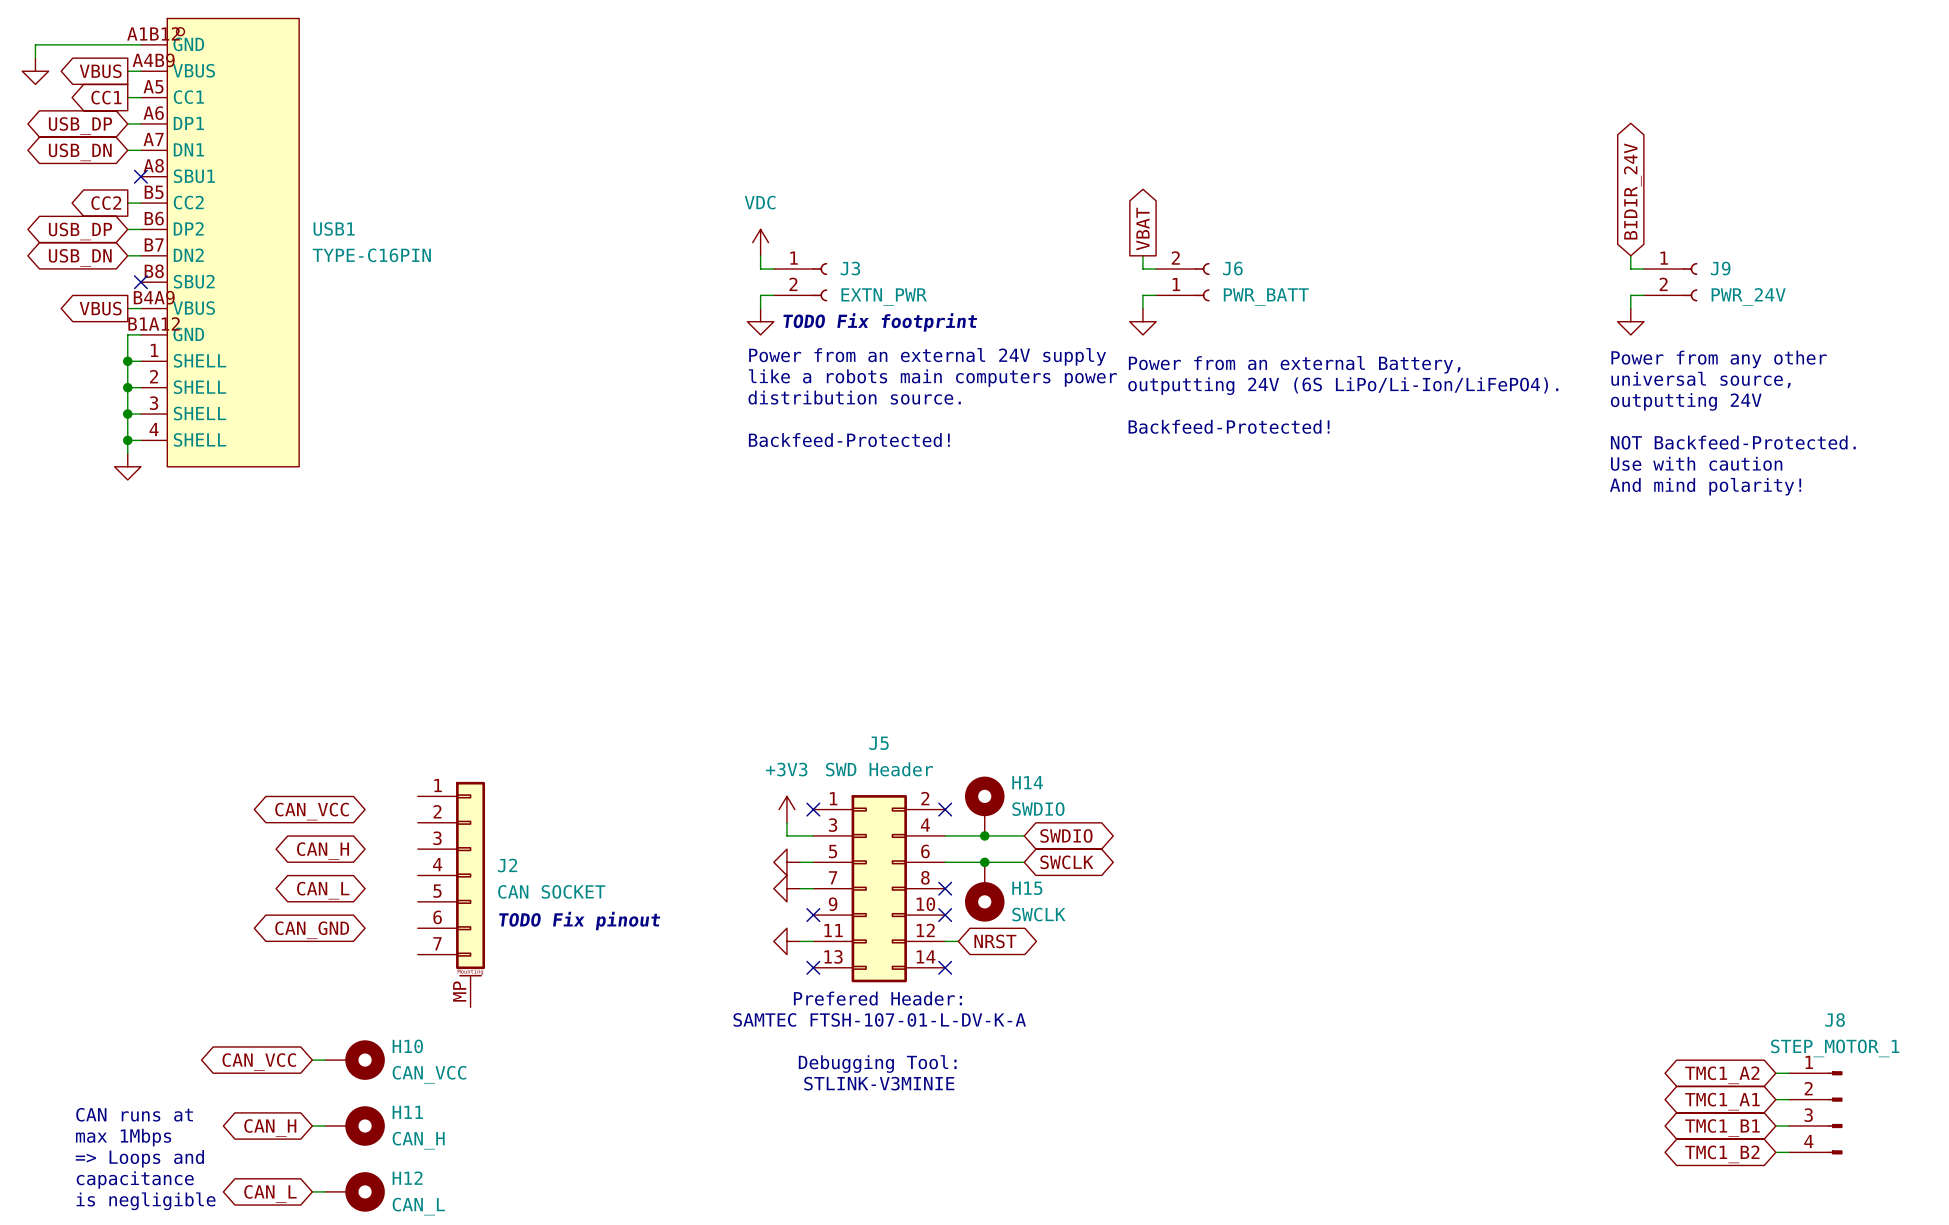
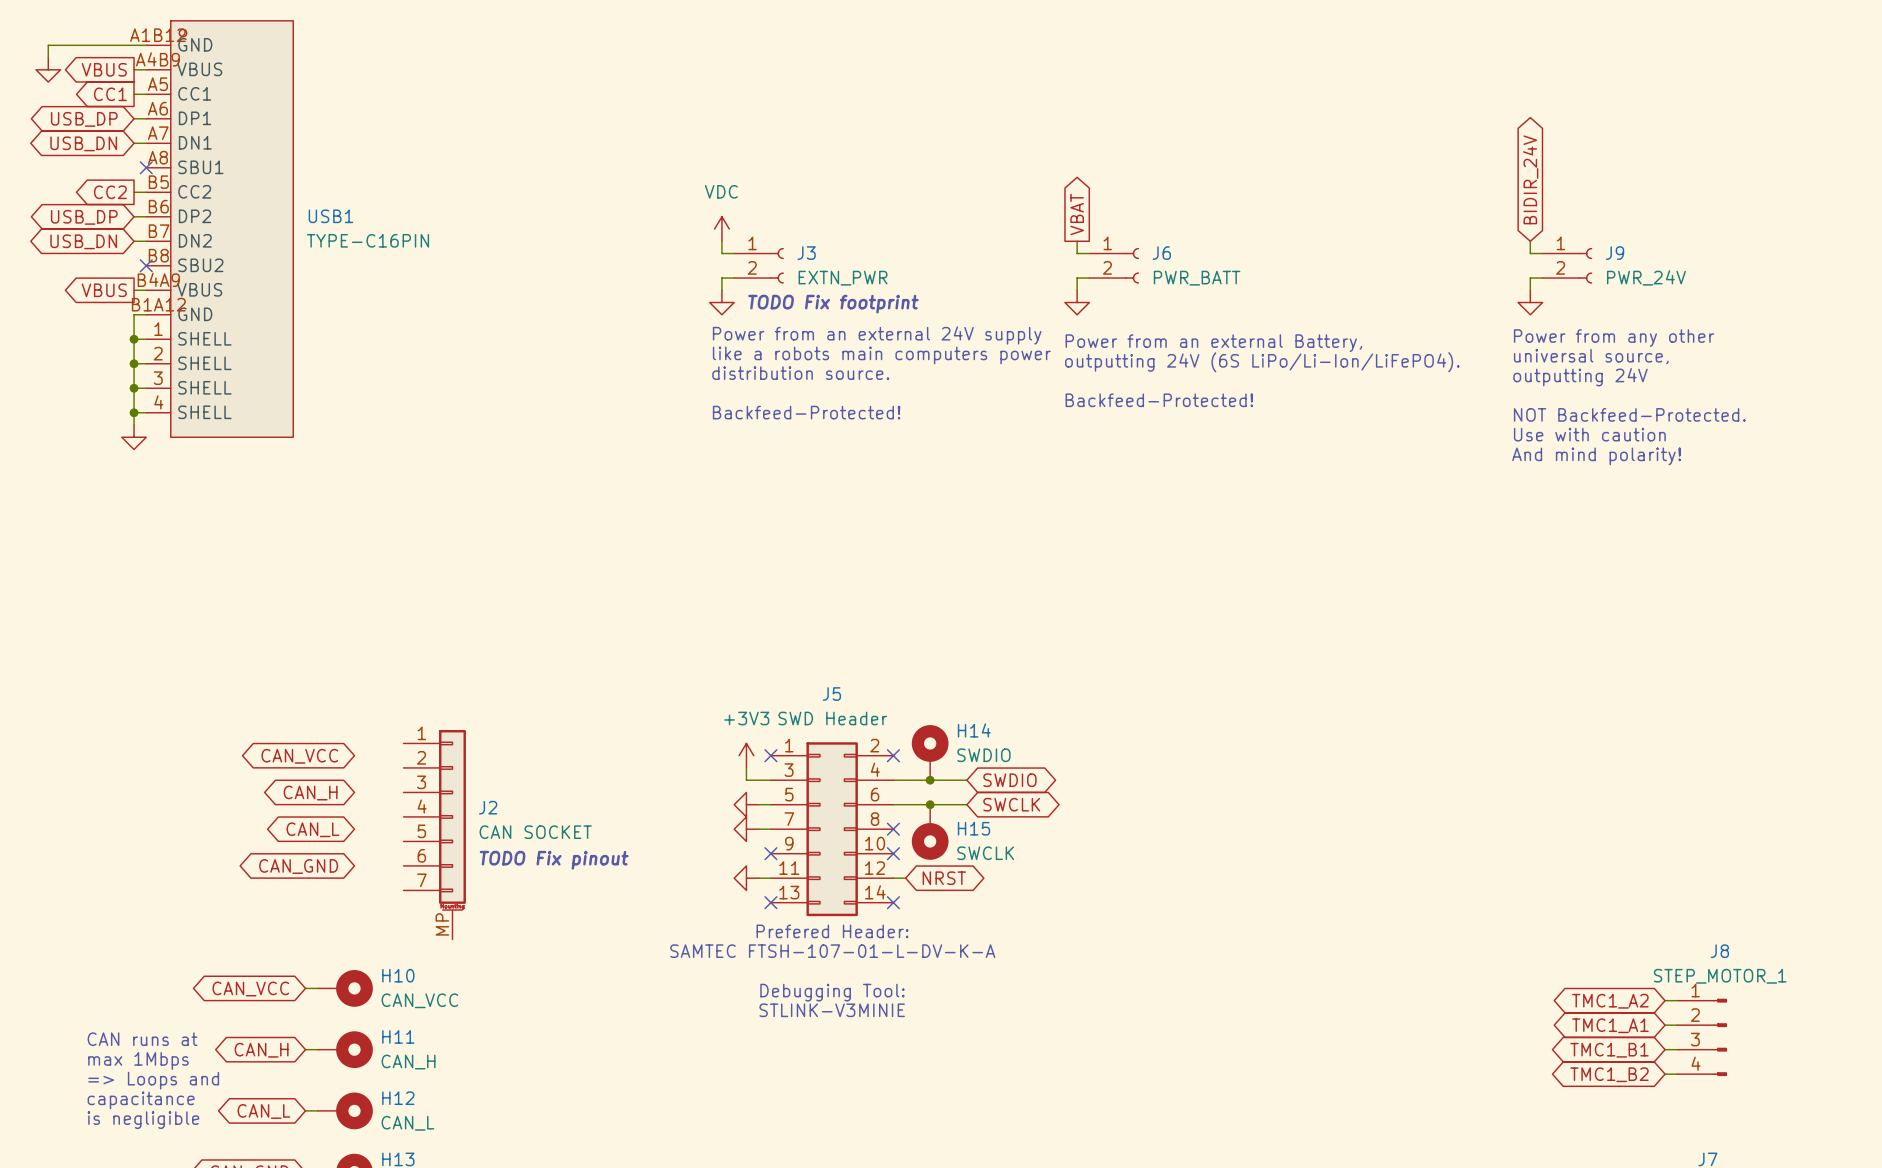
J6 flip: as is (1202, 282) -> up-down (1132, 265)

